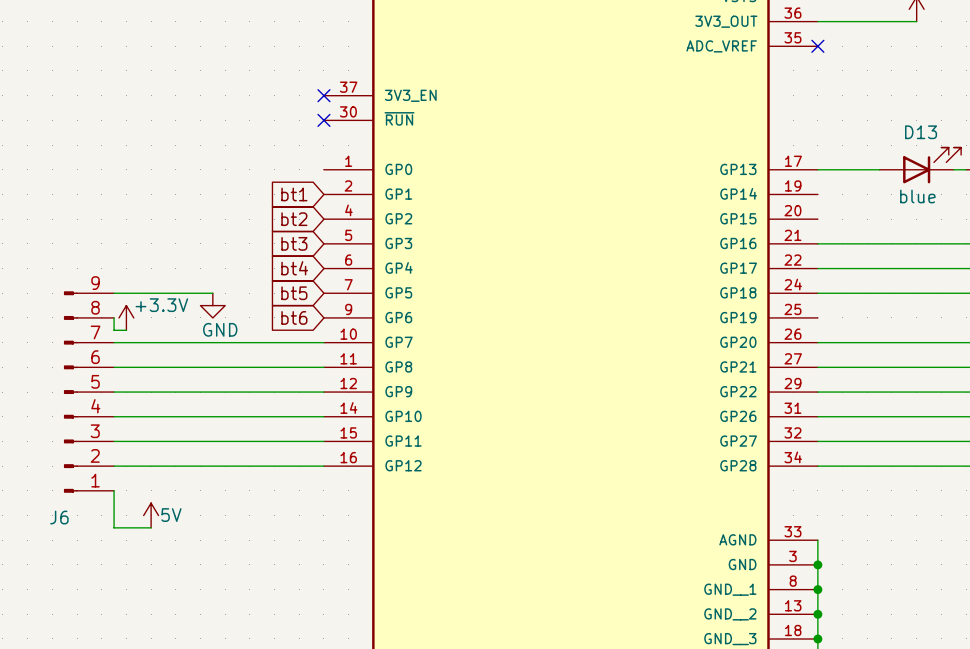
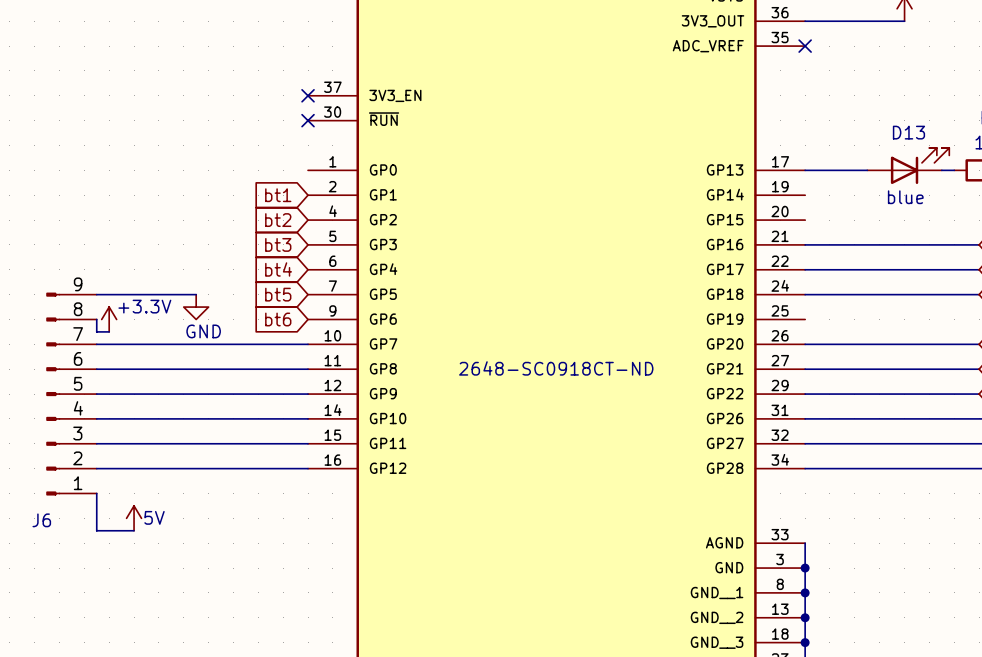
part text: none -> 2648-SC0918CT-ND (556, 368)

